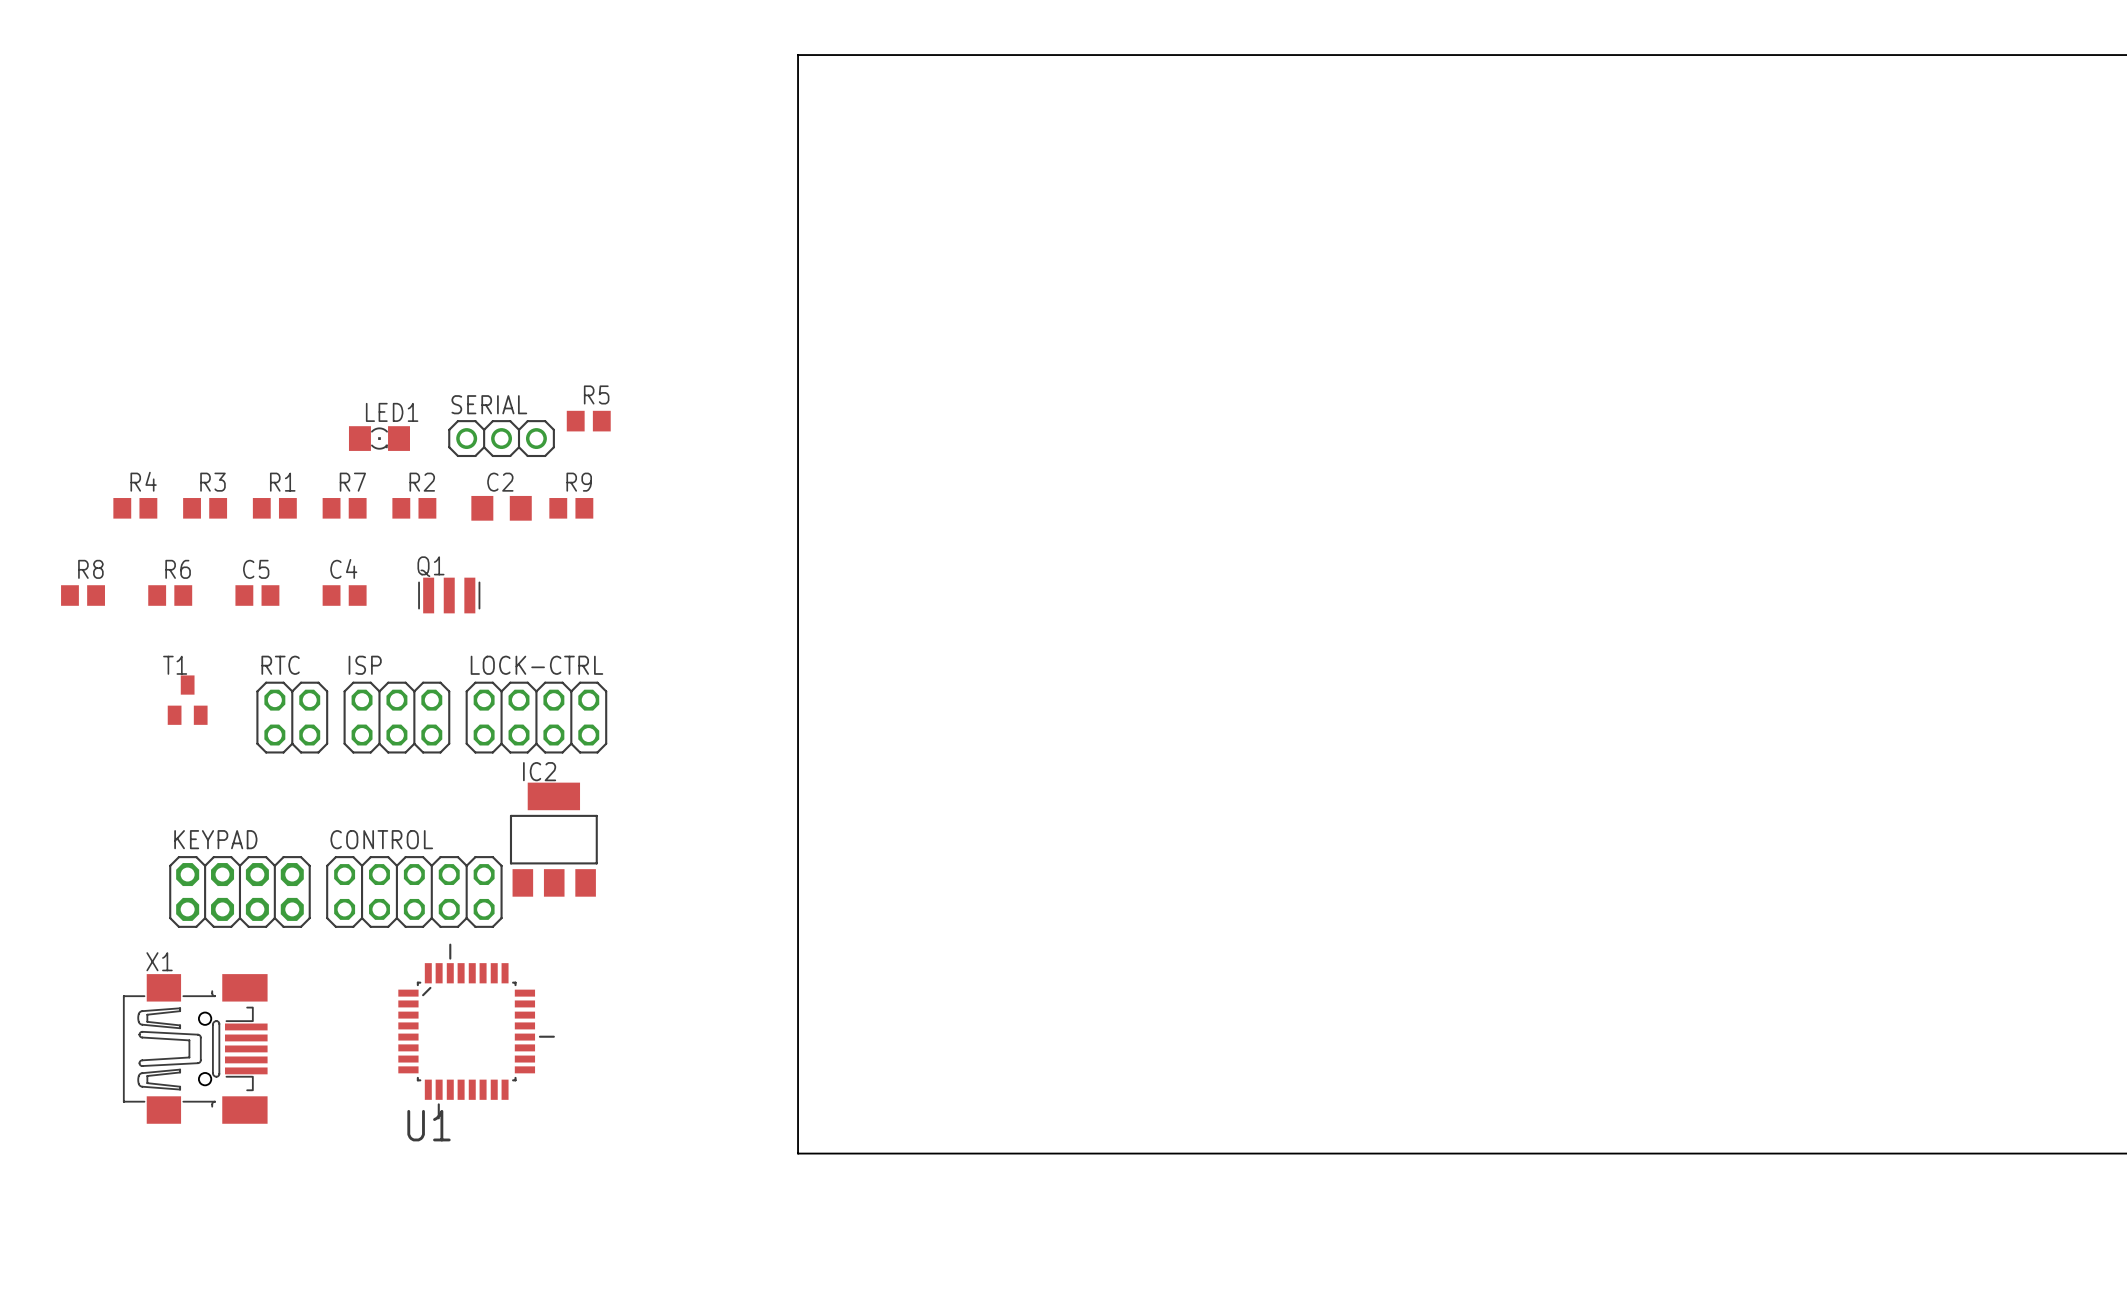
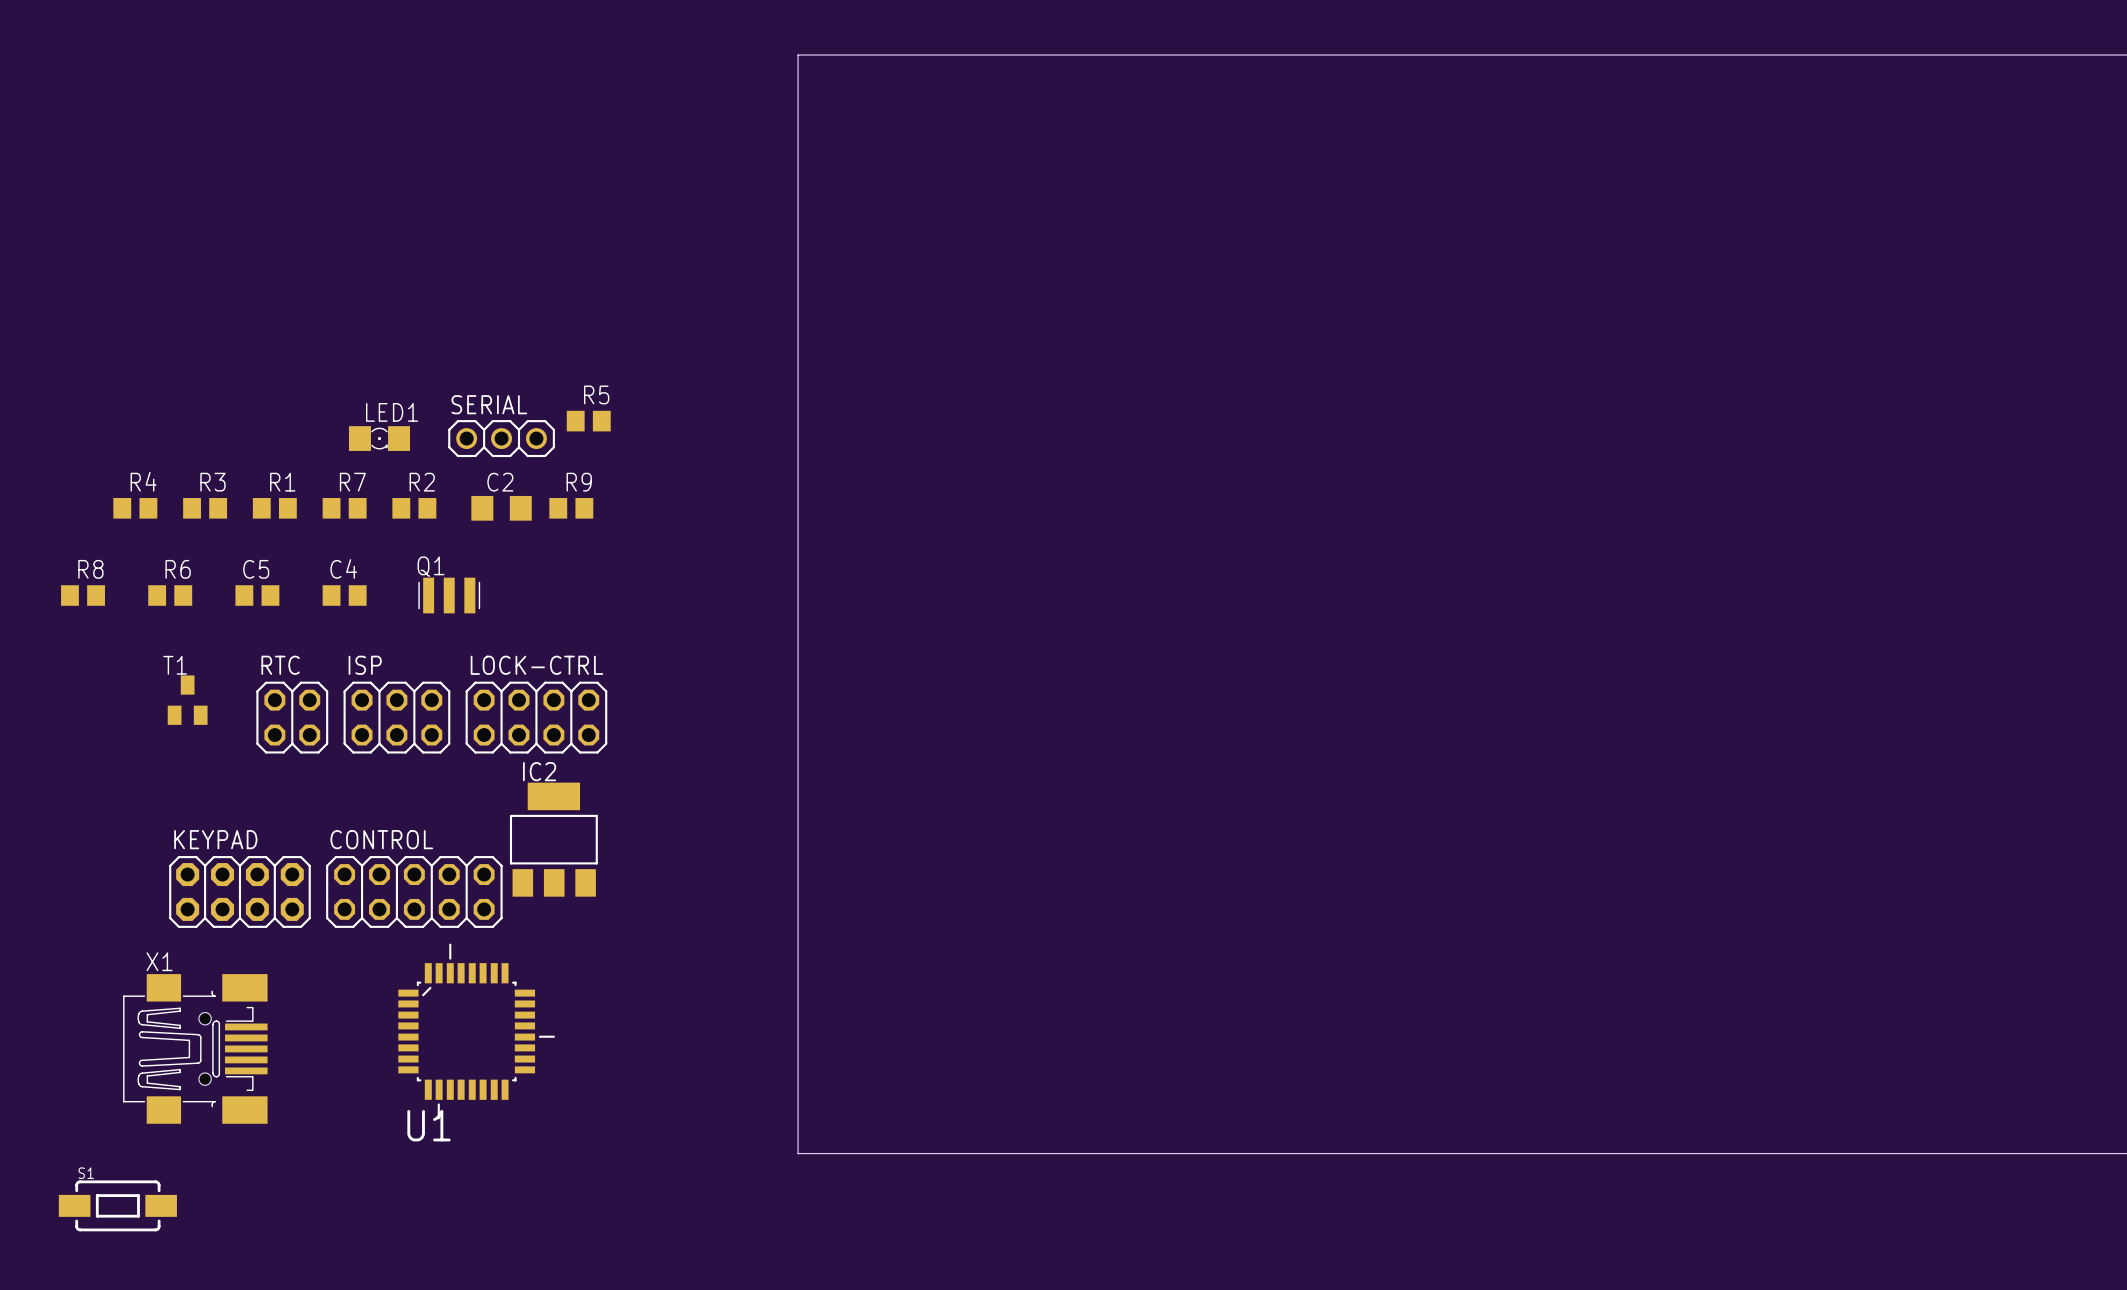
S1: none -> (117, 1205)

